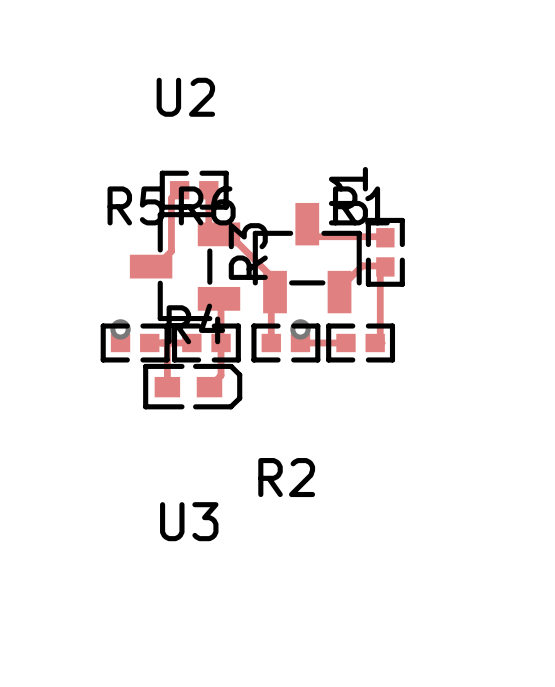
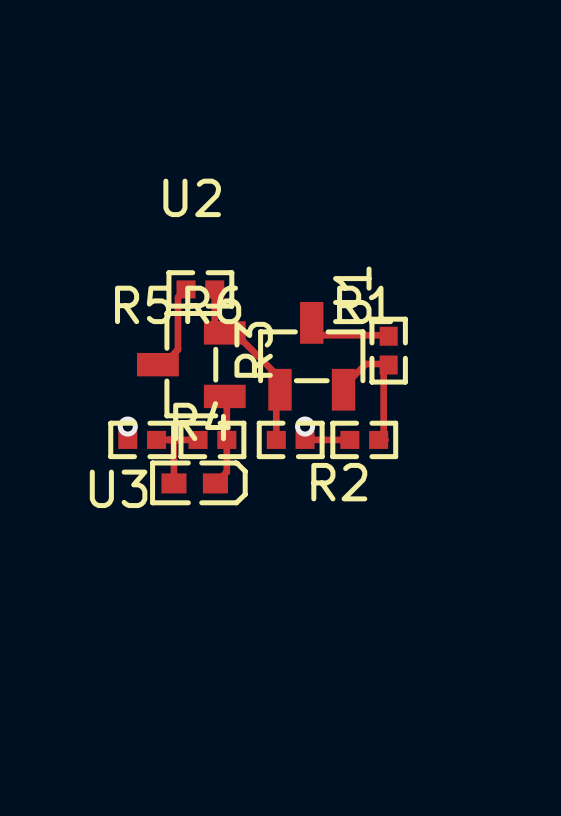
R2 name position: R2 (286, 477) -> R2 (339, 482)
U3 name position: U3 (189, 521) -> U3 (118, 488)

